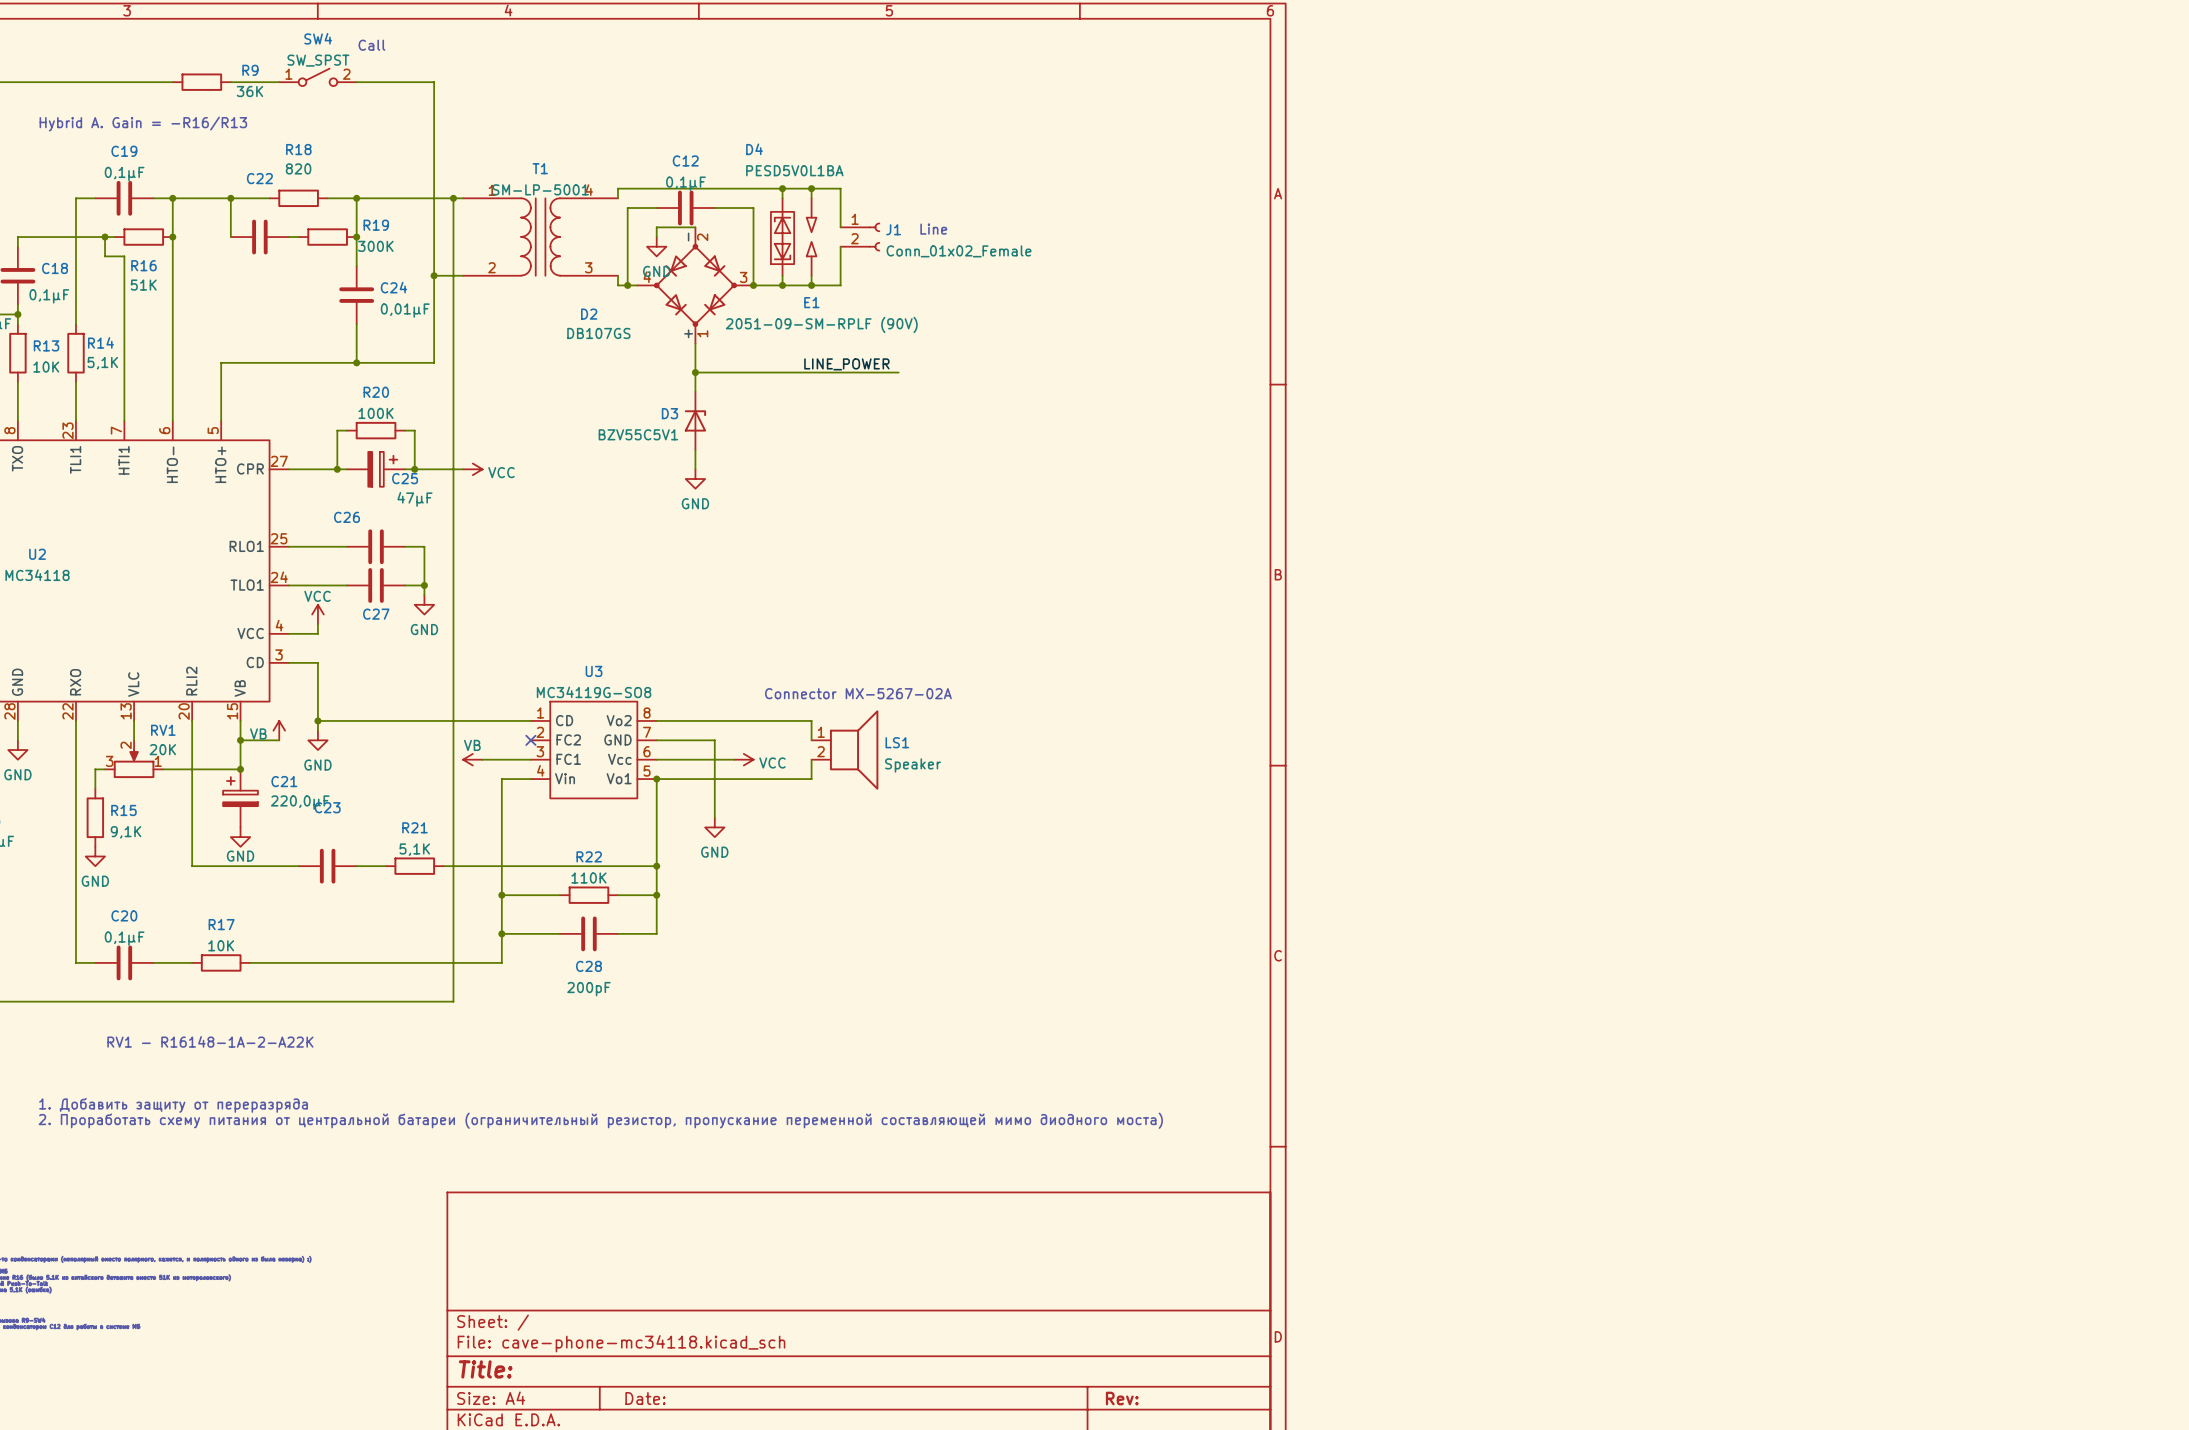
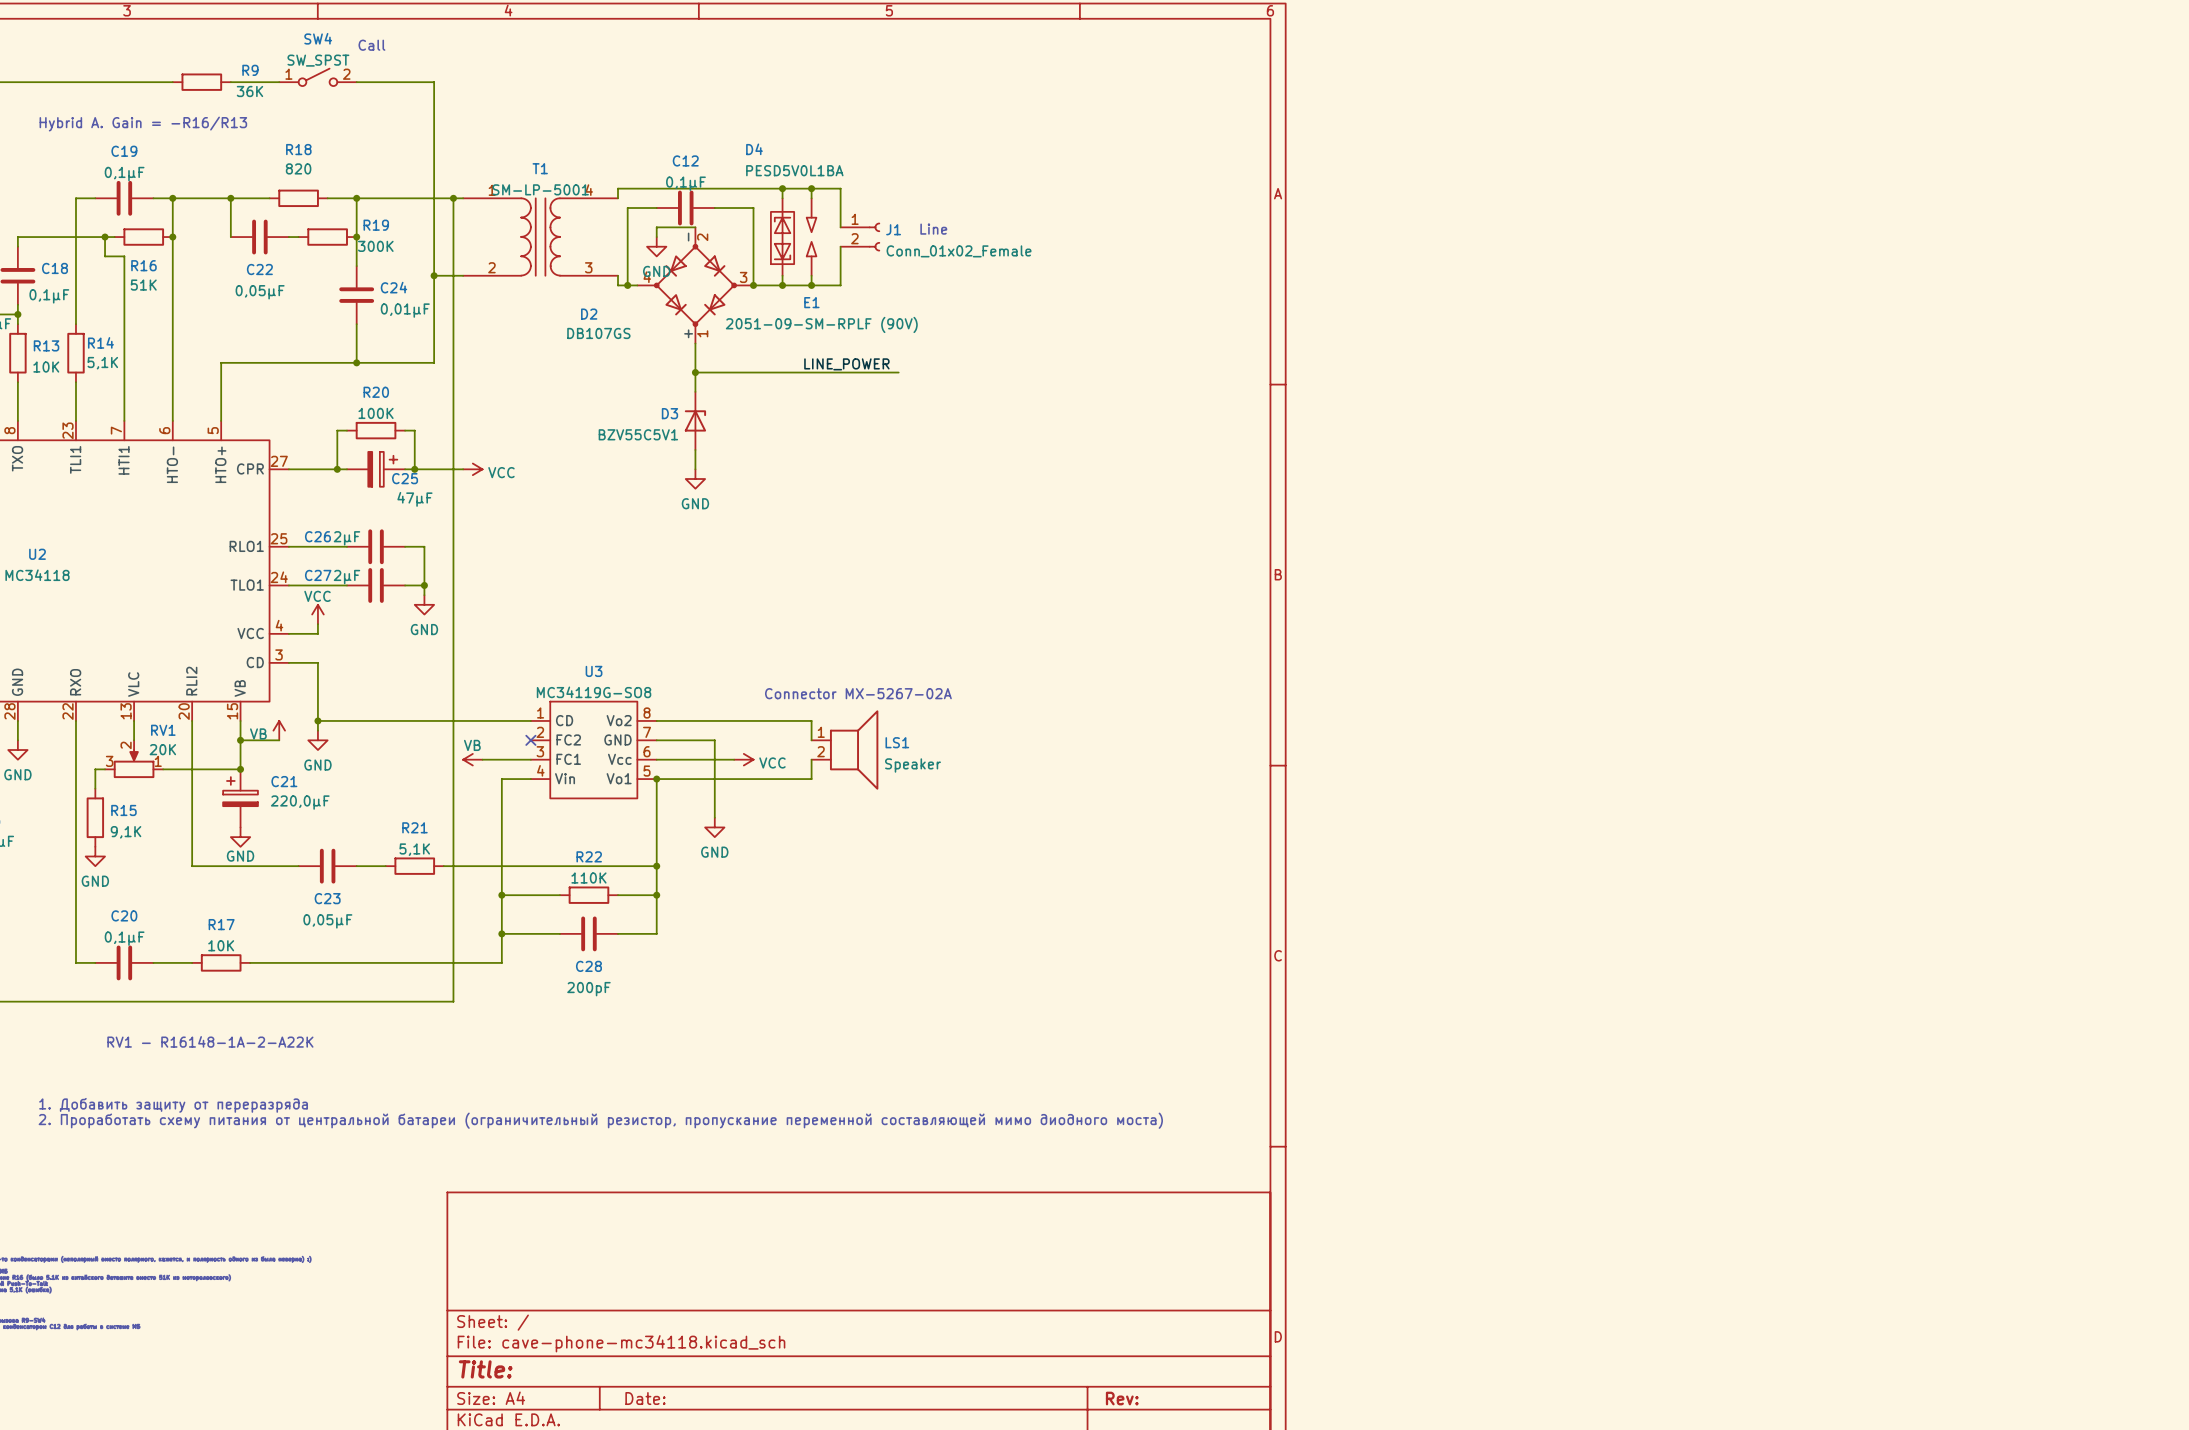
C22 name position: C22 (259, 178) -> C22 (259, 269)
C22 value: none -> 0,05µF (260, 292)
C26 name position: C26 (347, 517) -> C26 (317, 536)
C26 value: none -> 2µF (347, 538)
C27 value: none -> 2µF (347, 577)
C27 name position: C27 (376, 614) -> C27 (318, 575)
C23 name position: C23 (327, 807) -> C23 (327, 898)
C23 value: none -> 0,05µF (327, 921)

